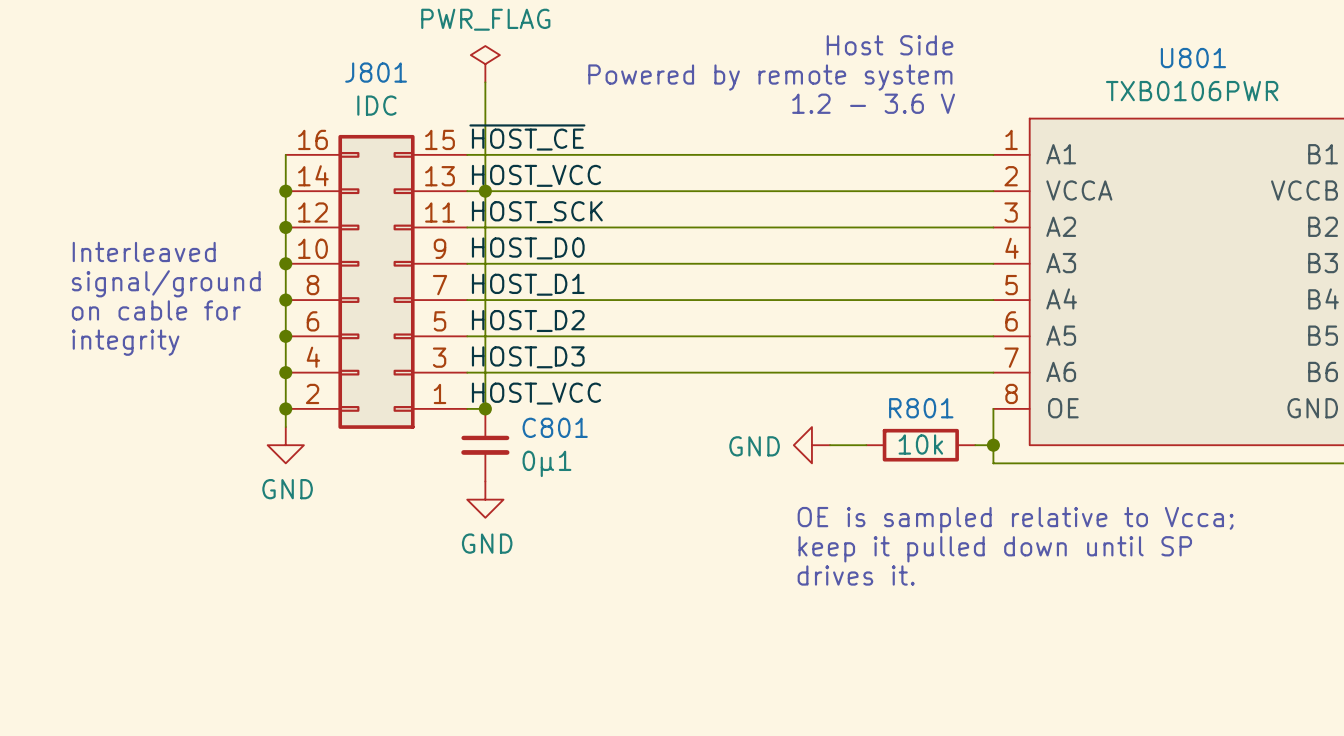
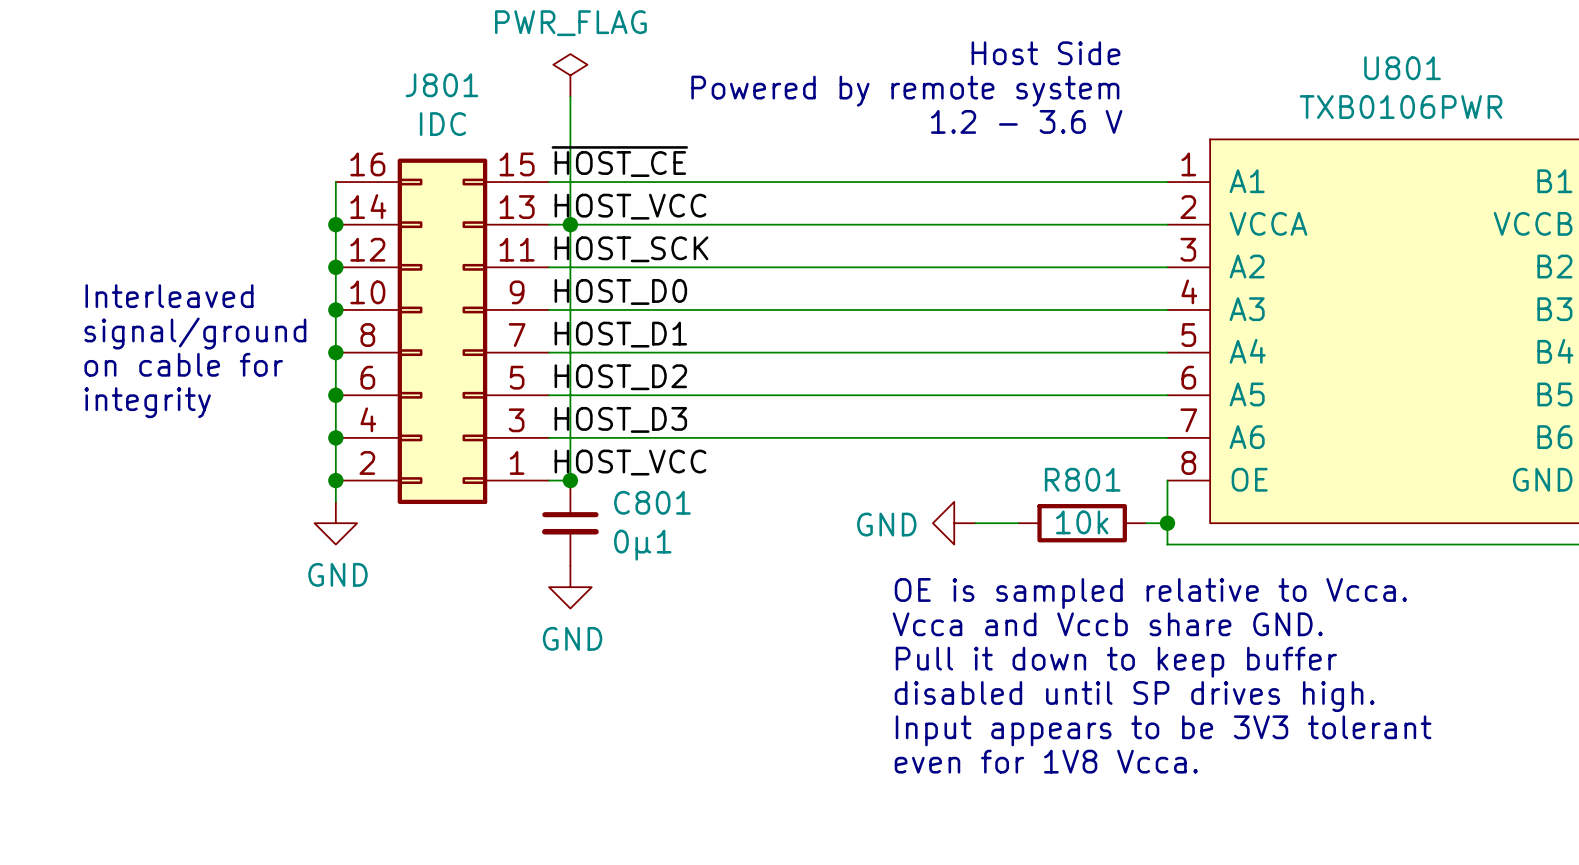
text: OE is sampled relative to Vcca; (1015, 520) -> OE is sampled relative to Vcca. (1150, 593)
text: none -> Vcca and Vccb share GND. (1107, 624)
text: keep it pulled down until SP (995, 549) -> none
text: none -> Pull it down to keep buffer (1116, 662)
text: drives it. (856, 575) -> none
text: none -> disabled until SP drives high. (1134, 696)
text: none -> Input appears to be 3V3 tolerant (1163, 730)
text: none -> even for 1V8 Vcca. (1046, 761)

